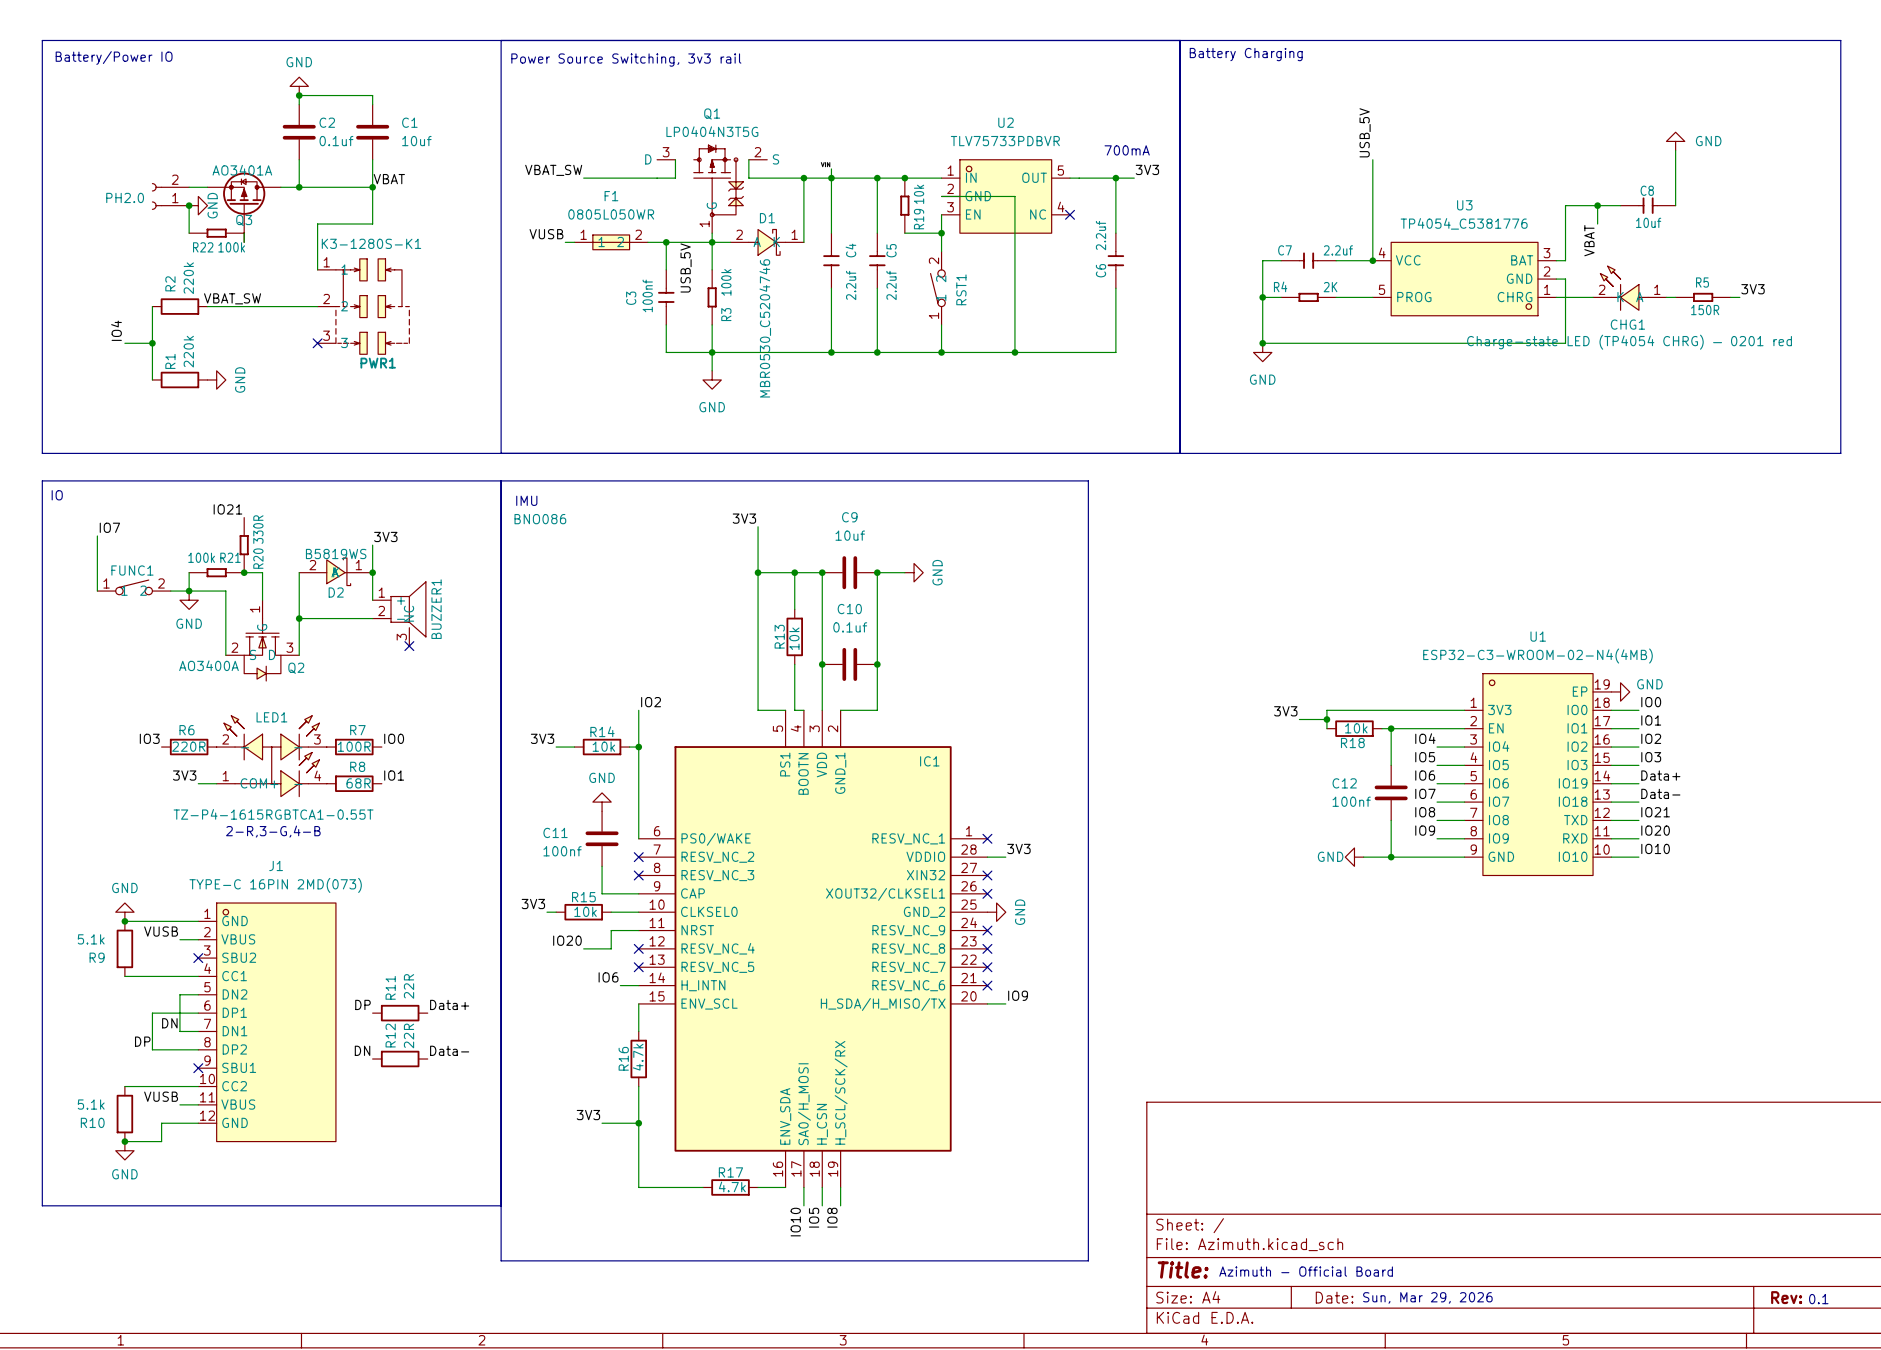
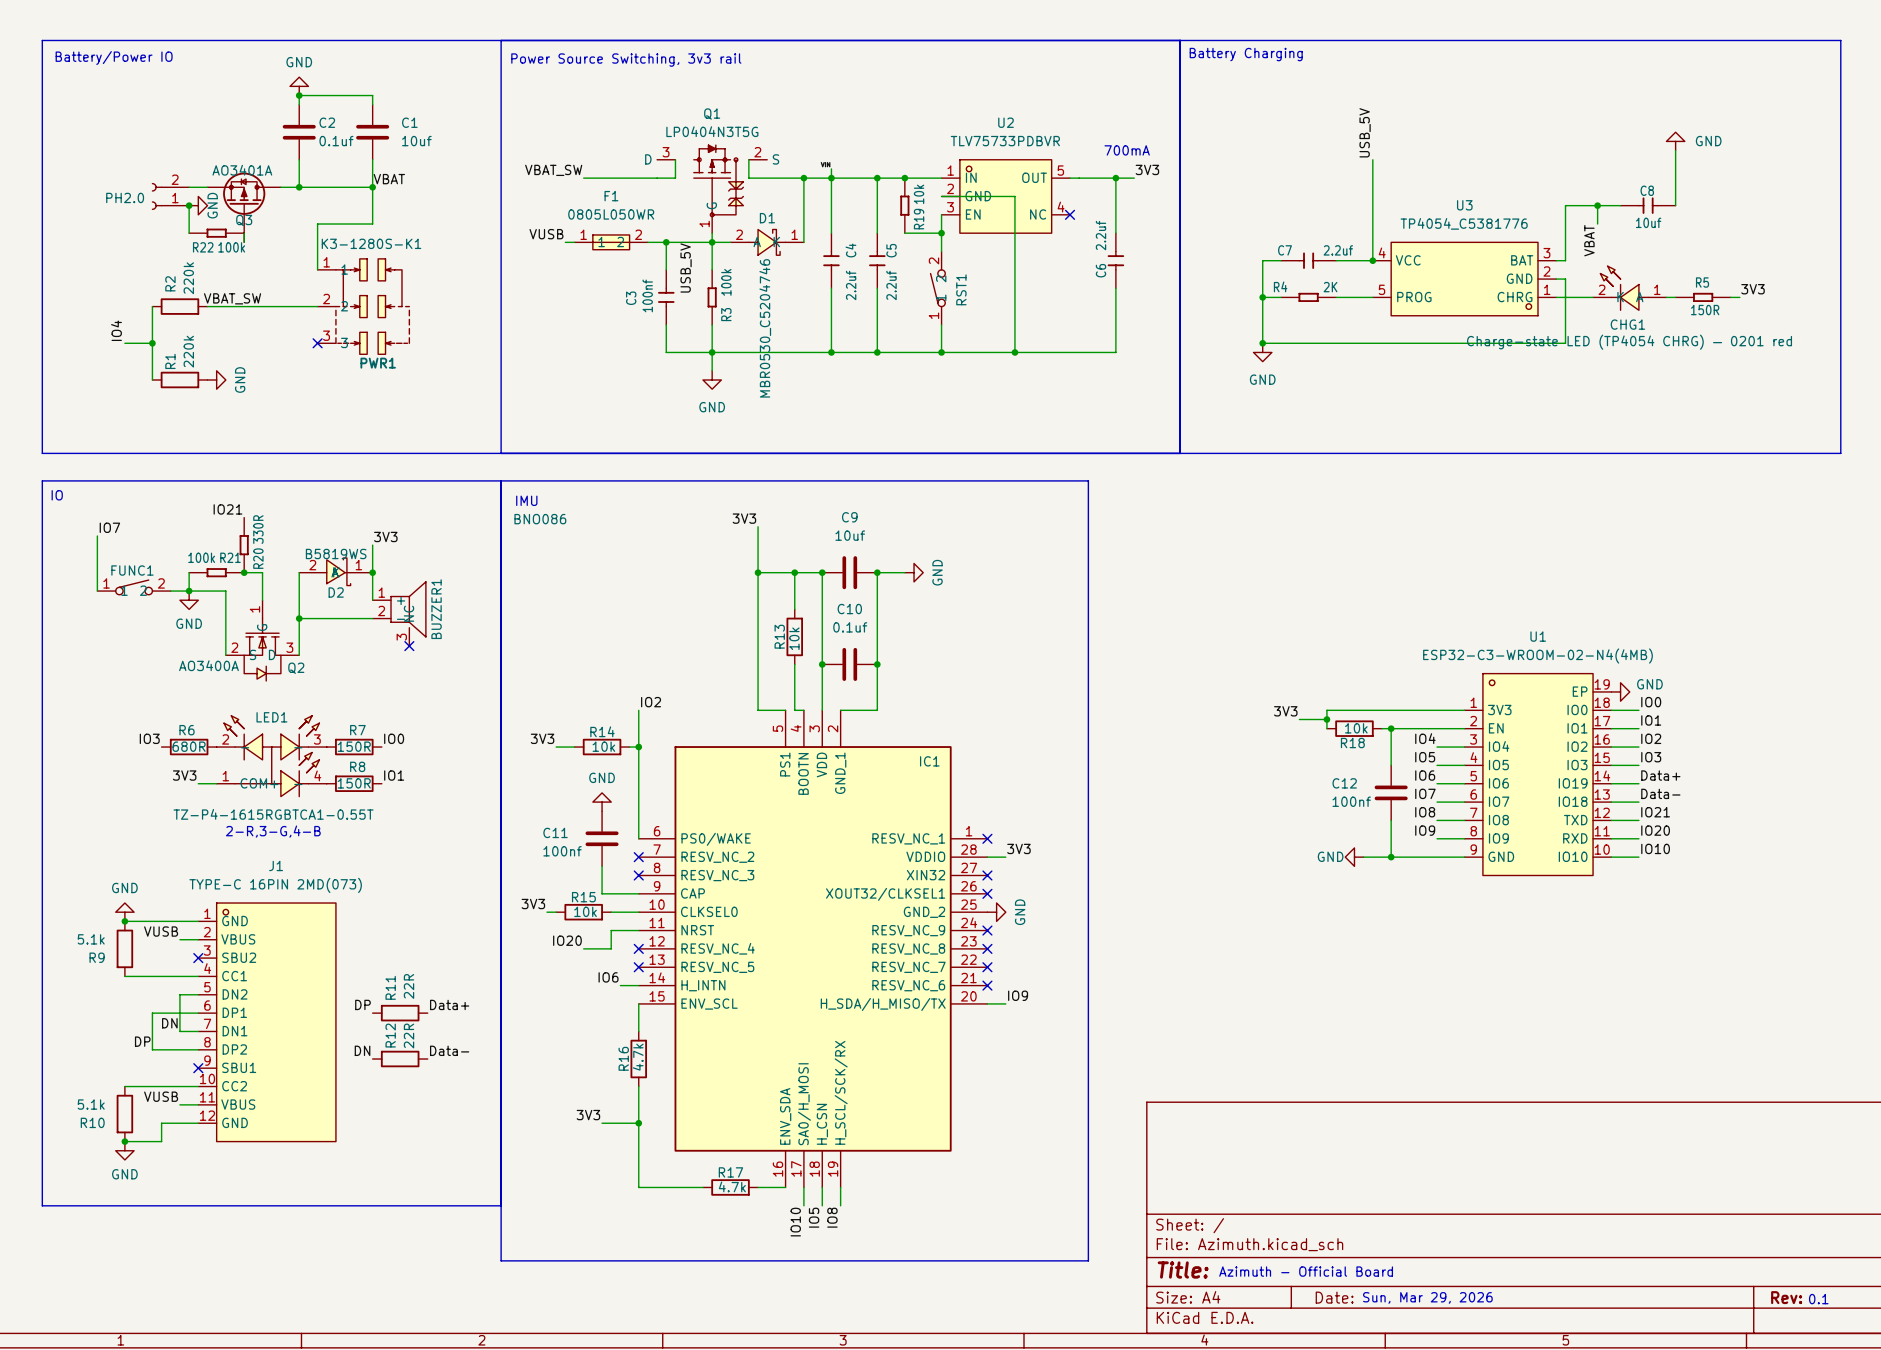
R6 value: 220R (188, 746) -> 680R (189, 746)
R7 value: 100R (354, 746) -> 150R (354, 746)
R8 value: 68R (358, 783) -> 150R (354, 783)

